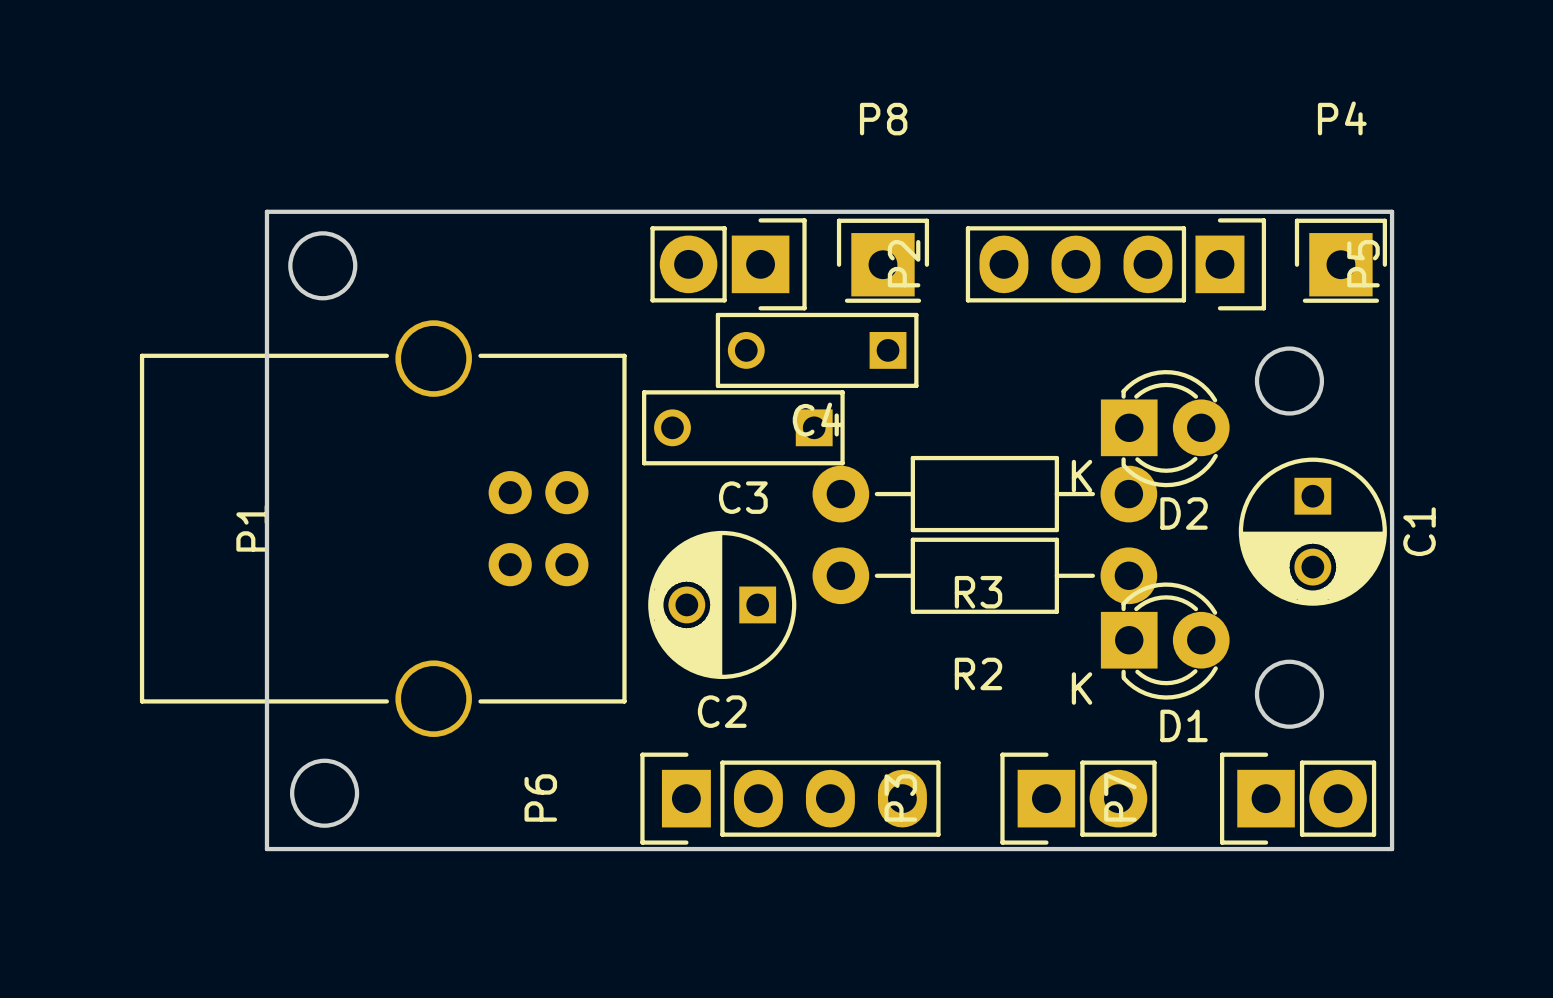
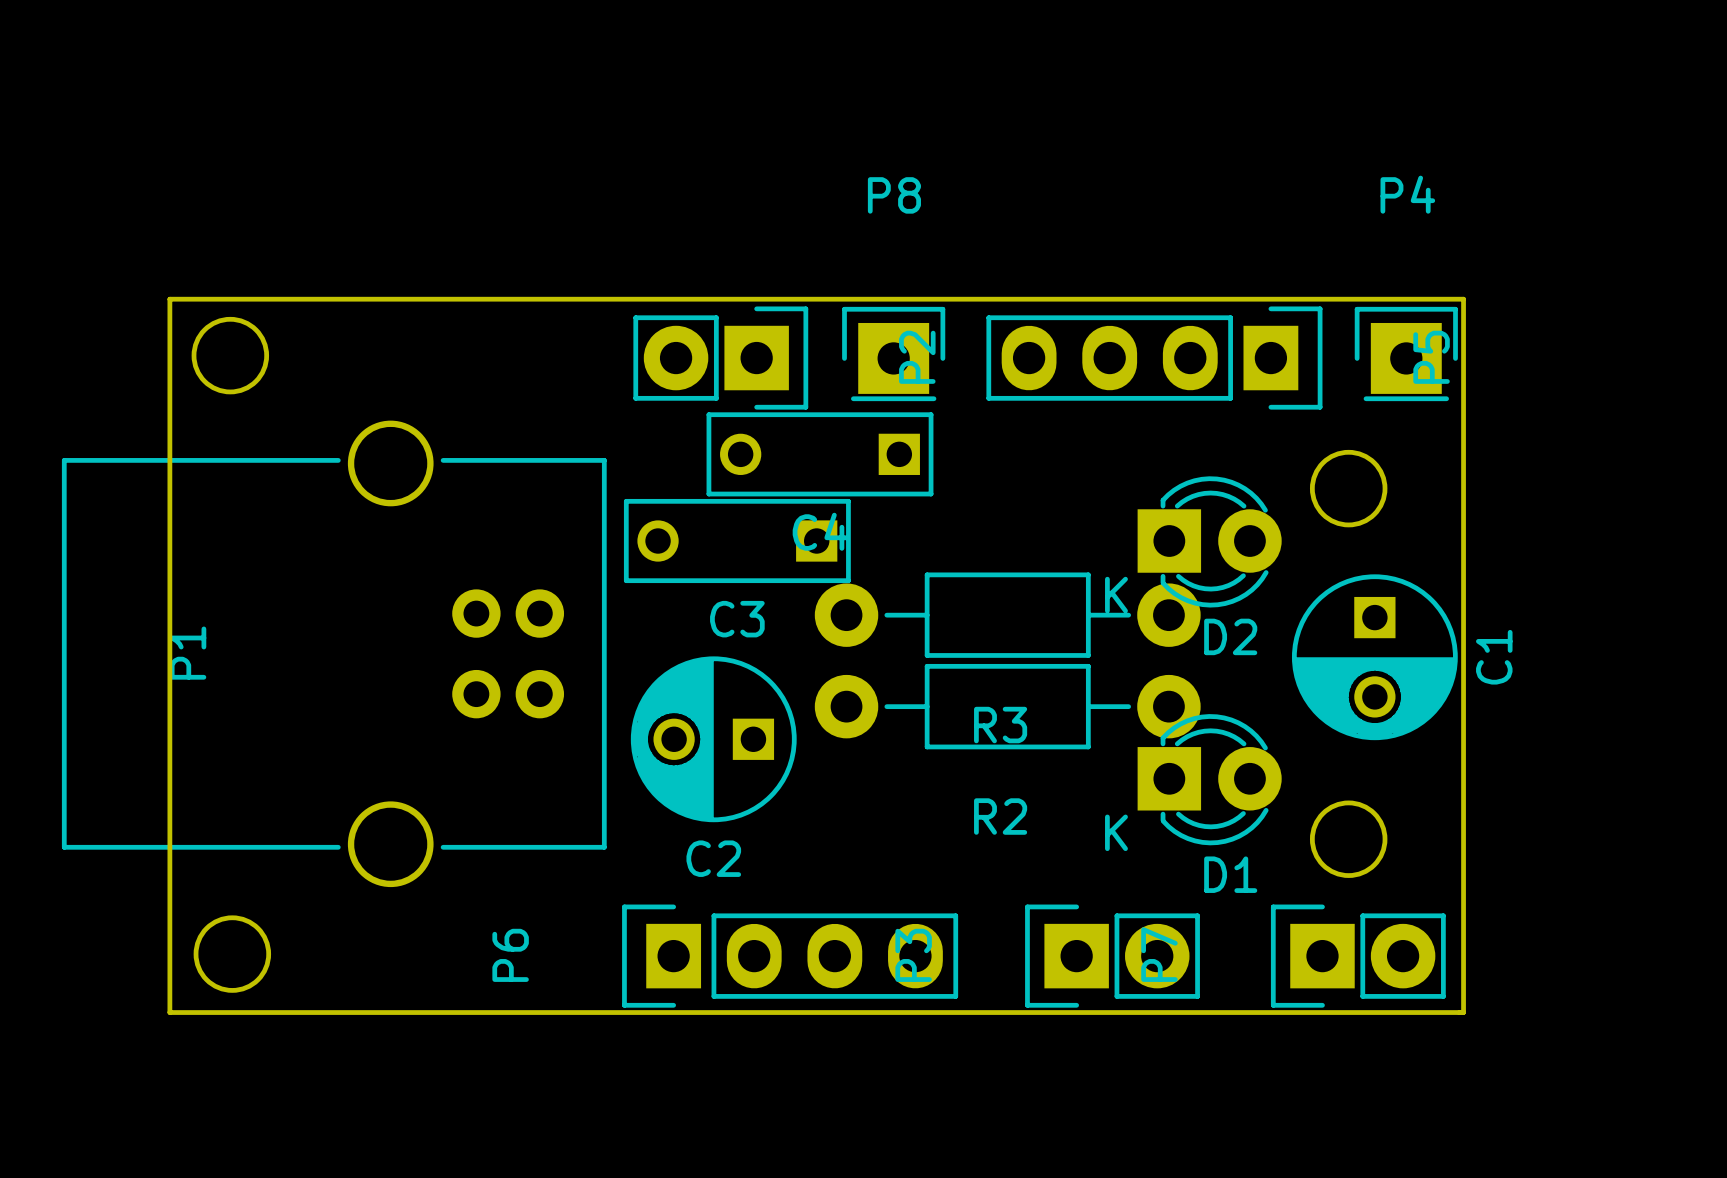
board edge: (266, 211) (266, 849) -> (204, 299) (169, 299) (169, 1012) (204, 1012)
round board edge position: (322, 265) -> (230, 355)
round board edge position: (324, 793) -> (232, 954)

